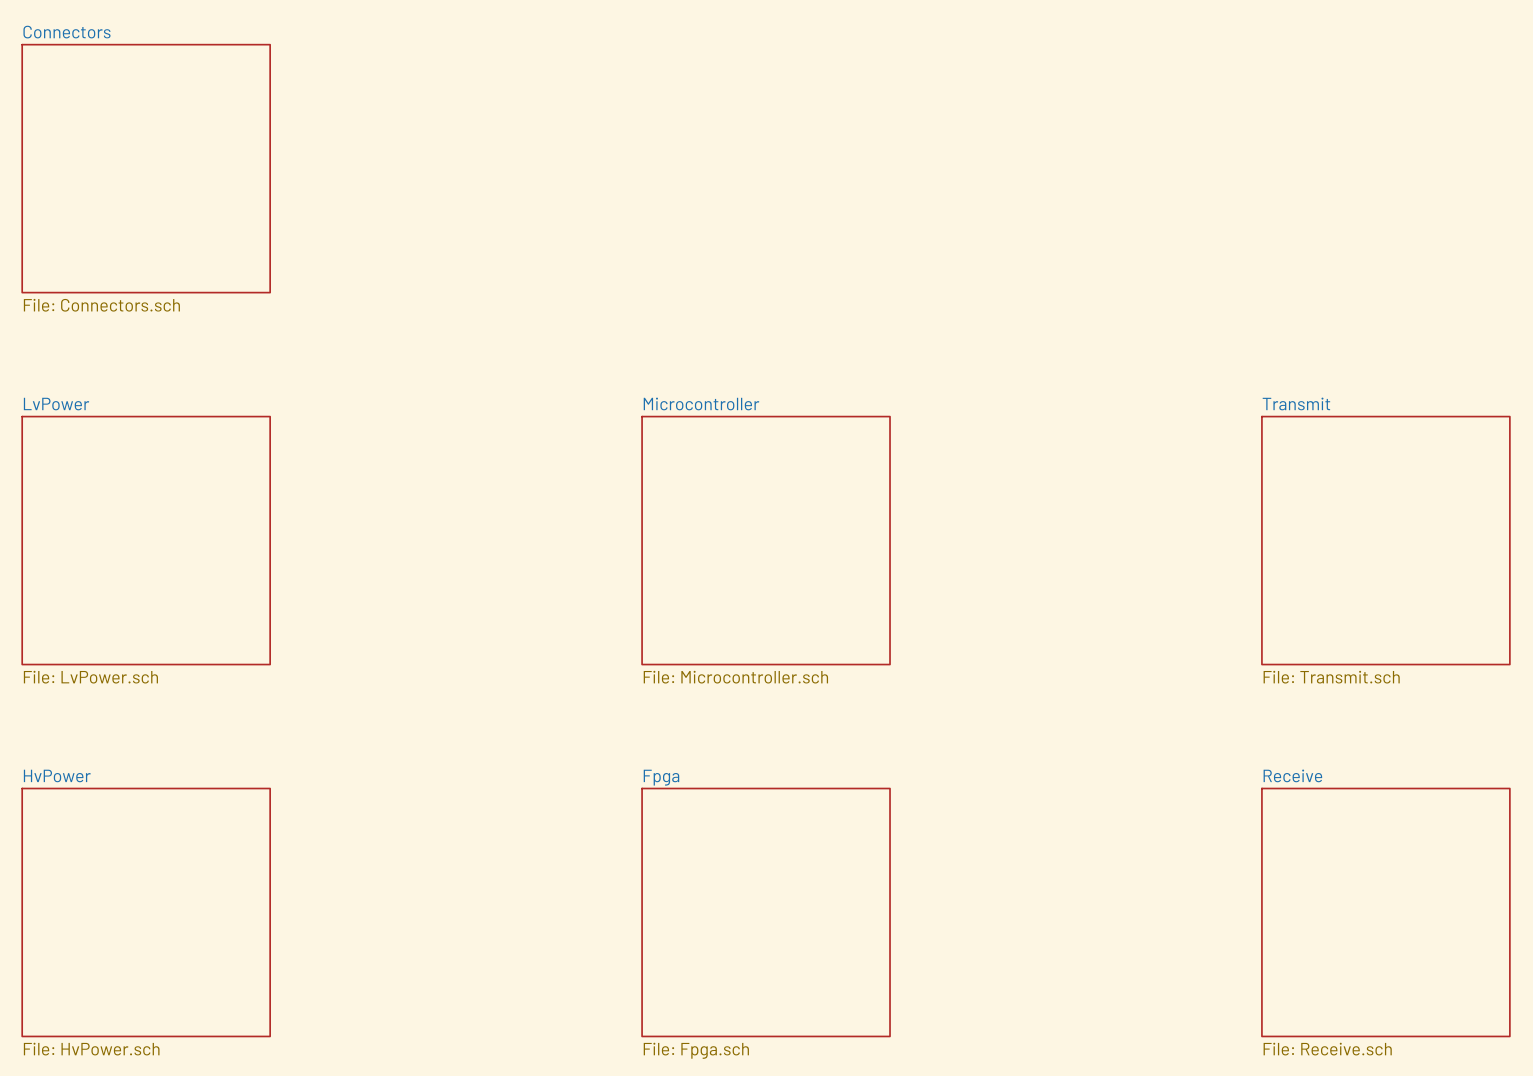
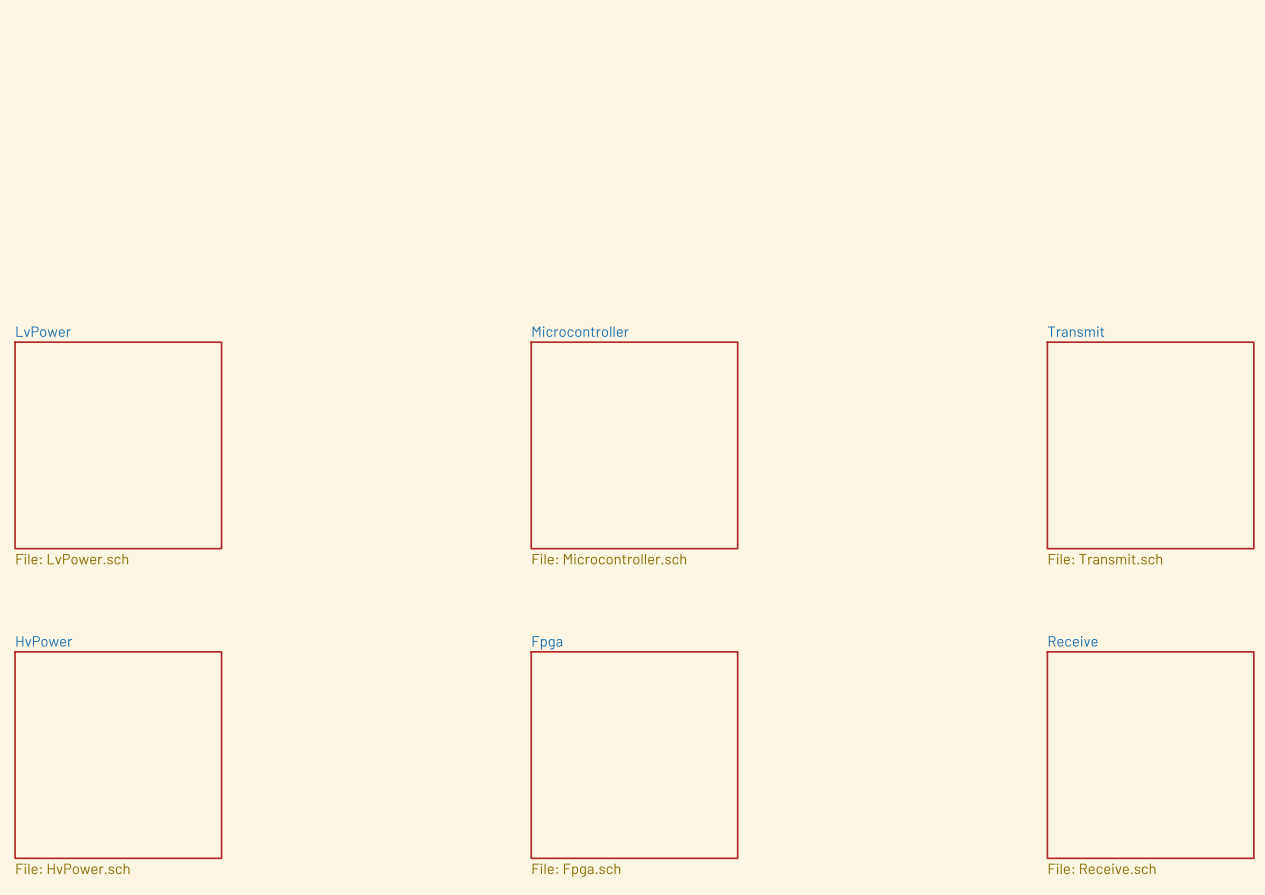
sheet Connectors: File: Connectors.sch (146, 168) -> none

